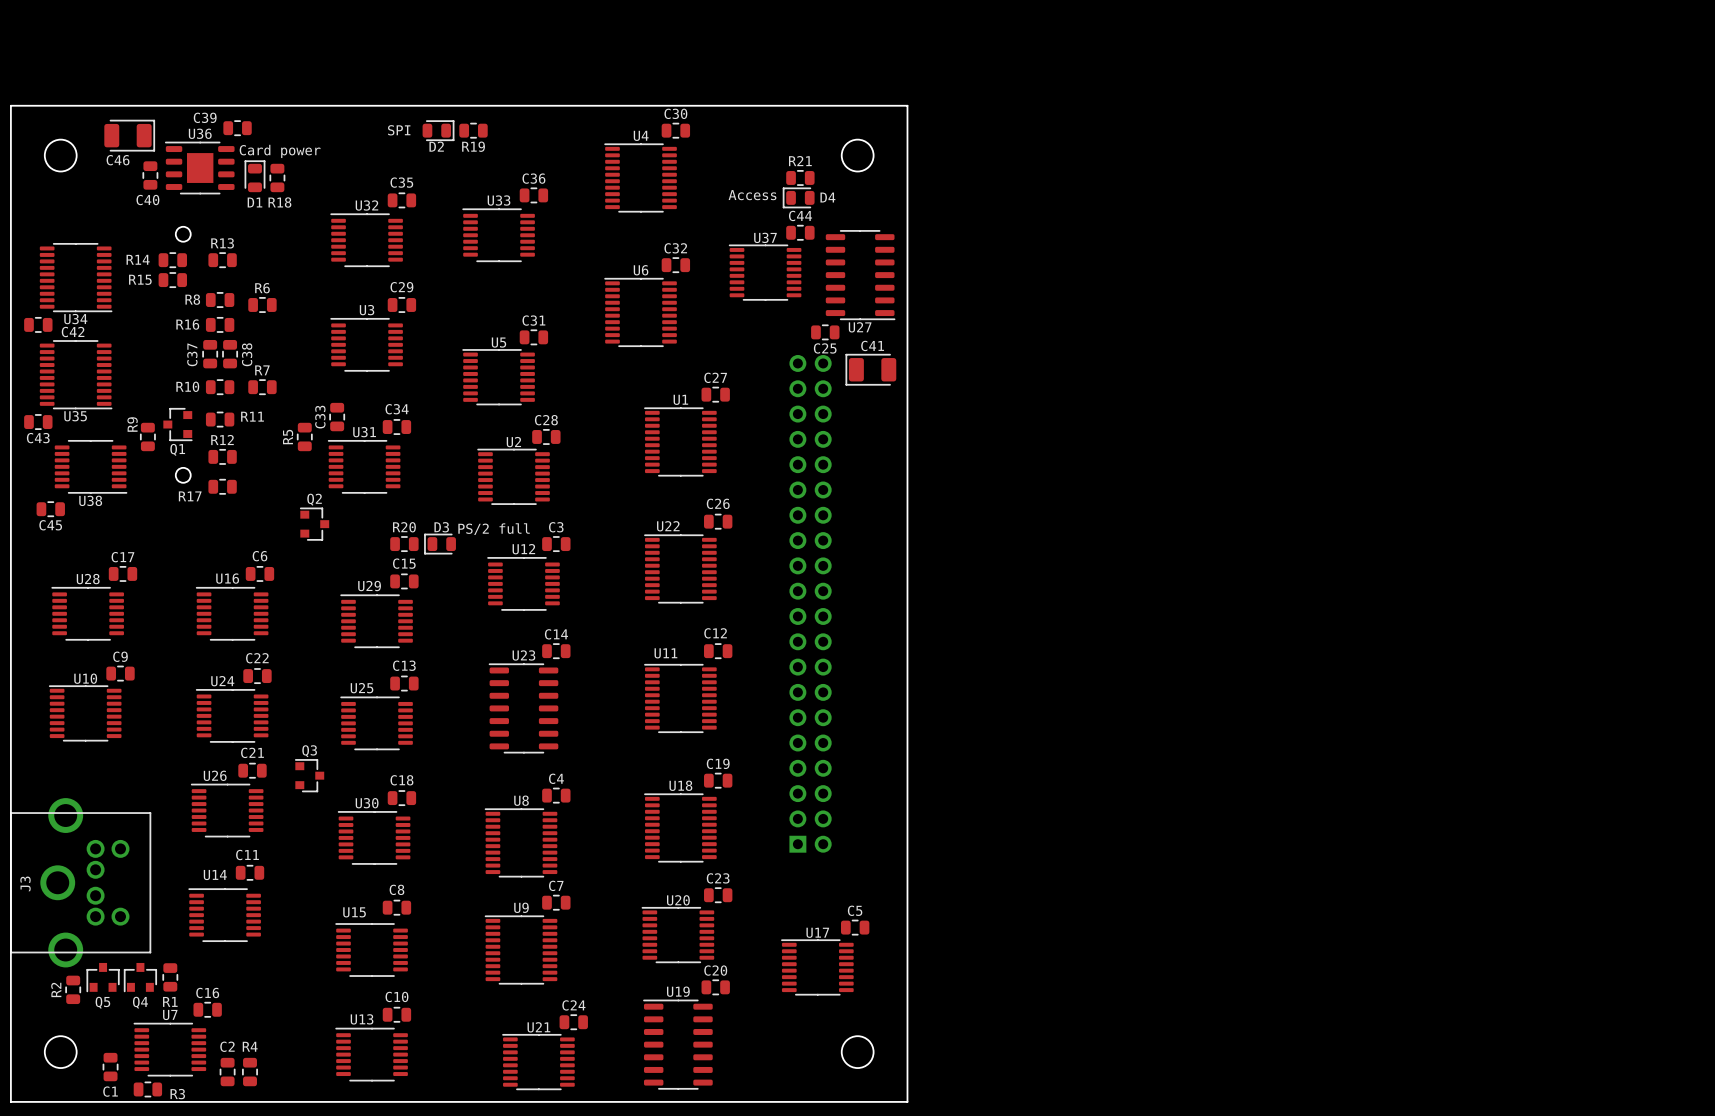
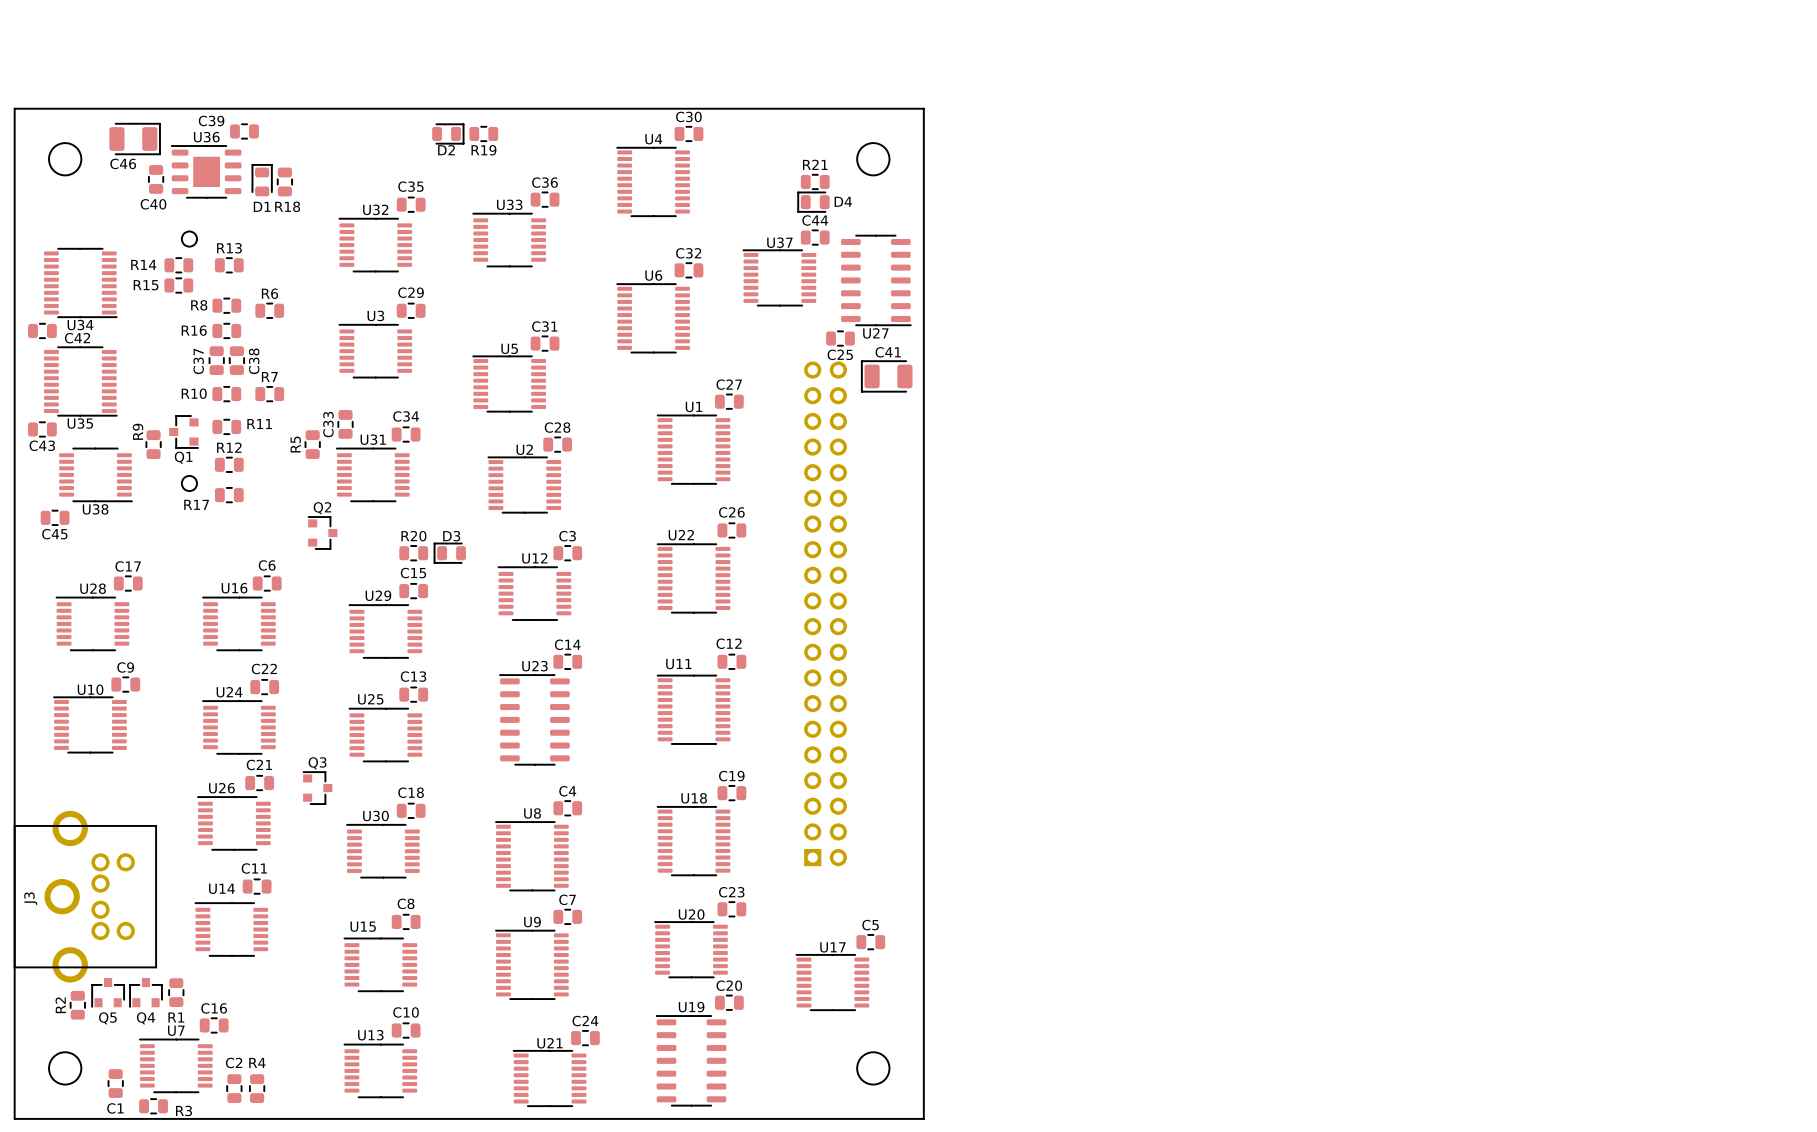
text: SPI (399, 130) -> none
text: Card power (280, 151) -> none
text: Access (752, 195) -> none
text: PS/2 full (494, 529) -> none

